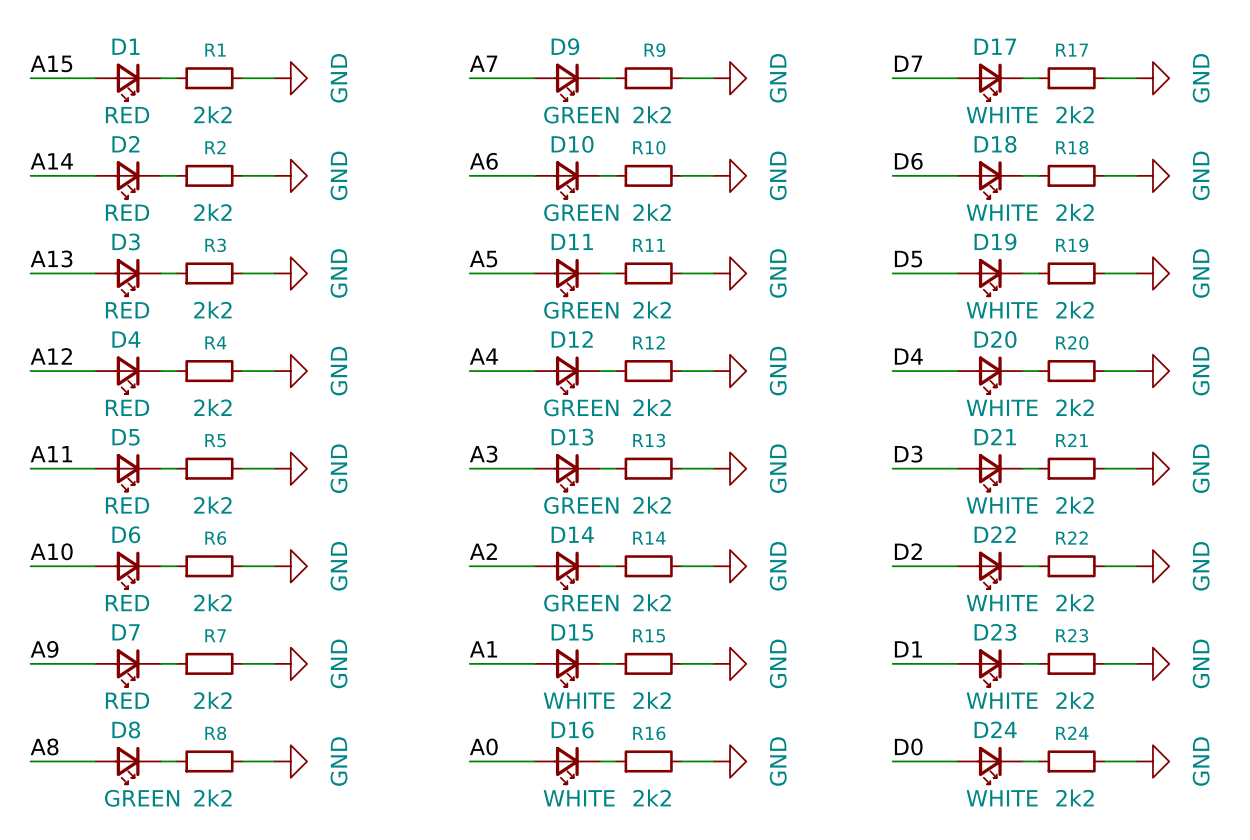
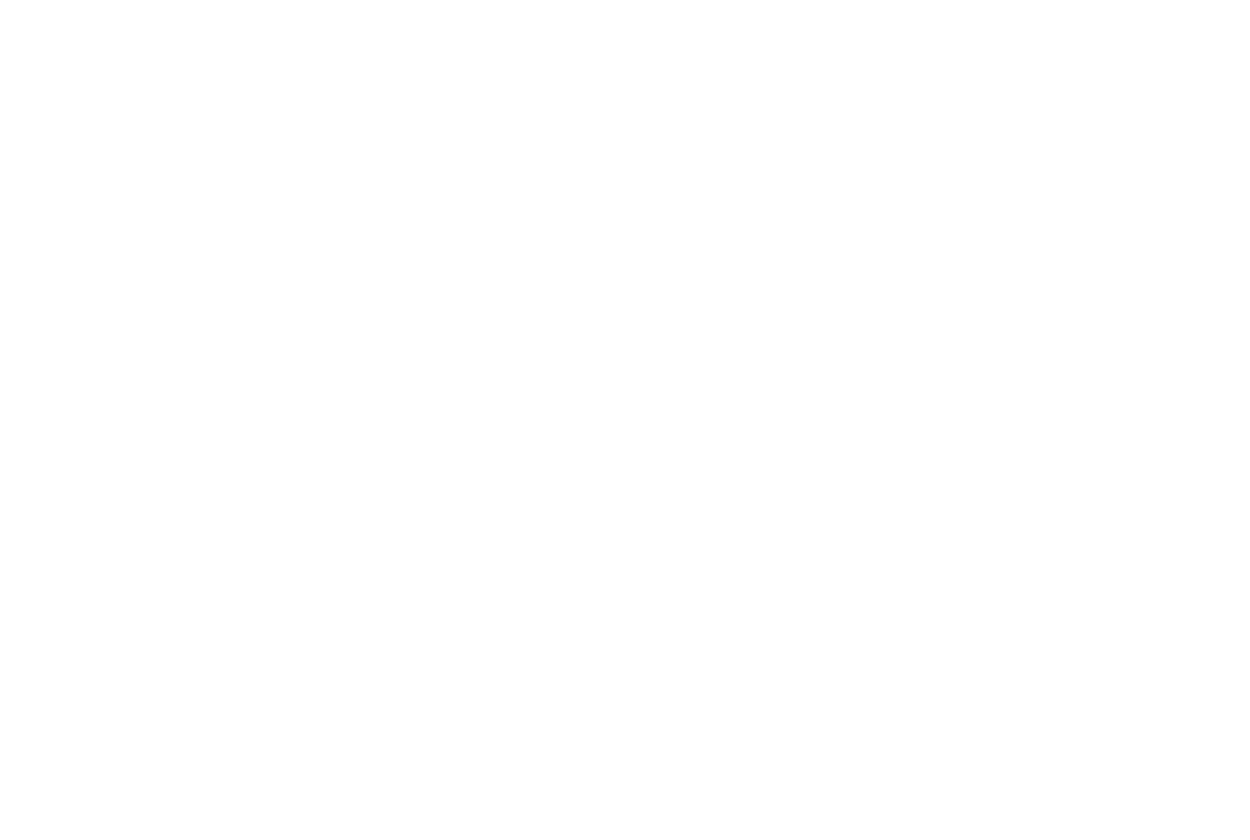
label: A15 (51, 63) -> none
label: A7 (483, 63) -> none
label: D7 (908, 63) -> none
wire: (30, 78) (95, 78) -> none
wire: (160, 78) (176, 78) -> none
R1: 2k2 (209, 78) -> none
wire: (241, 78) (274, 78) -> none
power symbol: GND (290, 78) -> none
wire: (469, 78) (534, 78) -> none
wire: (599, 78) (616, 78) -> none
R9: 2k2 (648, 78) -> none
wire: (681, 78) (713, 78) -> none
power symbol: GND (730, 78) -> none
wire: (892, 78) (957, 78) -> none
wire: (1022, 78) (1039, 78) -> none
R17: 2k2 (1071, 78) -> none
wire: (1104, 78) (1136, 78) -> none
power symbol: GND (1152, 78) -> none
D1: RED (128, 82) -> none
D9: GREEN (567, 82) -> none
D17: WHITE (990, 82) -> none
label: A14 (51, 161) -> none
label: A6 (483, 161) -> none
label: D6 (908, 161) -> none
wire: (30, 175) (95, 175) -> none
wire: (160, 175) (176, 175) -> none
R2: 2k2 (209, 175) -> none
wire: (241, 175) (274, 175) -> none
power symbol: GND (290, 175) -> none
wire: (469, 175) (534, 175) -> none
wire: (599, 175) (616, 175) -> none
R10: 2k2 (648, 175) -> none
wire: (681, 175) (713, 175) -> none
power symbol: GND (730, 175) -> none
wire: (892, 175) (957, 175) -> none
wire: (1022, 175) (1039, 175) -> none
R18: 2k2 (1071, 175) -> none
wire: (1104, 175) (1136, 175) -> none
power symbol: GND (1152, 175) -> none
D2: RED (128, 179) -> none
D10: GREEN (567, 179) -> none
D18: WHITE (990, 179) -> none
label: A13 (51, 258) -> none
label: A5 (483, 259) -> none
label: D5 (908, 259) -> none
wire: (30, 273) (95, 273) -> none
wire: (160, 273) (176, 273) -> none
R3: 2k2 (209, 273) -> none
wire: (241, 273) (274, 273) -> none
power symbol: GND (290, 273) -> none
wire: (469, 273) (534, 273) -> none
wire: (599, 273) (616, 273) -> none
R11: 2k2 (648, 273) -> none
wire: (681, 273) (713, 273) -> none
power symbol: GND (730, 273) -> none
wire: (892, 273) (957, 273) -> none
wire: (1022, 273) (1039, 273) -> none
R19: 2k2 (1071, 273) -> none
wire: (1104, 273) (1136, 273) -> none
power symbol: GND (1152, 273) -> none
D3: RED (128, 277) -> none
D11: GREEN (567, 277) -> none
D19: WHITE (990, 277) -> none
label: A12 (51, 356) -> none
label: A4 (483, 356) -> none
label: D4 (908, 356) -> none
wire: (30, 371) (95, 371) -> none
wire: (160, 371) (176, 371) -> none
R4: 2k2 (209, 371) -> none
wire: (241, 371) (274, 371) -> none
power symbol: GND (290, 371) -> none
wire: (469, 371) (534, 371) -> none
wire: (599, 371) (616, 371) -> none
R12: 2k2 (648, 371) -> none
wire: (681, 371) (713, 371) -> none
power symbol: GND (730, 371) -> none
wire: (892, 371) (957, 371) -> none
wire: (1022, 371) (1039, 371) -> none
R20: 2k2 (1071, 371) -> none
wire: (1104, 371) (1136, 371) -> none
power symbol: GND (1152, 371) -> none
D4: RED (128, 375) -> none
D12: GREEN (567, 375) -> none
D20: WHITE (990, 375) -> none
label: A11 (51, 454) -> none
label: A3 (483, 454) -> none
label: D3 (908, 454) -> none
wire: (30, 468) (95, 468) -> none
wire: (160, 468) (176, 468) -> none
R5: 2k2 (209, 468) -> none
wire: (241, 468) (274, 468) -> none
power symbol: GND (290, 468) -> none
wire: (469, 468) (534, 468) -> none
wire: (599, 468) (616, 468) -> none
R13: 2k2 (648, 468) -> none
wire: (681, 468) (713, 468) -> none
power symbol: GND (730, 468) -> none
wire: (892, 468) (957, 468) -> none
wire: (1022, 468) (1039, 468) -> none
R21: 2k2 (1071, 468) -> none
wire: (1104, 468) (1136, 468) -> none
power symbol: GND (1152, 468) -> none
D5: RED (128, 472) -> none
D13: GREEN (567, 472) -> none
D21: WHITE (990, 472) -> none
label: A10 (51, 551) -> none
label: A2 (483, 551) -> none
label: D2 (908, 551) -> none
wire: (30, 566) (95, 566) -> none
wire: (160, 566) (176, 566) -> none
R6: 2k2 (209, 566) -> none
wire: (241, 566) (274, 566) -> none
power symbol: GND (290, 566) -> none
wire: (469, 566) (534, 566) -> none
wire: (599, 566) (616, 566) -> none
R14: 2k2 (648, 566) -> none
wire: (681, 566) (713, 566) -> none
power symbol: GND (730, 566) -> none
wire: (892, 566) (957, 566) -> none
wire: (1022, 566) (1039, 566) -> none
R22: 2k2 (1071, 566) -> none
wire: (1104, 566) (1136, 566) -> none
power symbol: GND (1152, 566) -> none
D6: RED (128, 570) -> none
D14: GREEN (567, 570) -> none
D22: WHITE (990, 570) -> none
label: A9 (44, 649) -> none
label: A1 (483, 649) -> none
label: D1 (908, 649) -> none
wire: (30, 663) (95, 663) -> none
wire: (160, 663) (176, 663) -> none
R7: 2k2 (209, 663) -> none
wire: (241, 663) (274, 663) -> none
power symbol: GND (290, 663) -> none
wire: (469, 663) (534, 663) -> none
wire: (599, 663) (616, 663) -> none
R15: 2k2 (648, 663) -> none
wire: (681, 663) (713, 663) -> none
power symbol: GND (730, 663) -> none
wire: (892, 663) (957, 663) -> none
wire: (1022, 663) (1039, 663) -> none
R23: 2k2 (1071, 663) -> none
wire: (1104, 663) (1136, 663) -> none
power symbol: GND (1152, 663) -> none
D7: RED (128, 667) -> none
D15: WHITE (567, 667) -> none
D23: WHITE (990, 667) -> none
label: A8 (44, 746) -> none
label: A0 (483, 746) -> none
label: D0 (908, 746) -> none
wire: (30, 761) (95, 761) -> none
wire: (160, 761) (176, 761) -> none
R8: 2k2 (209, 761) -> none
wire: (241, 761) (274, 761) -> none
power symbol: GND (290, 761) -> none
wire: (469, 761) (534, 761) -> none
wire: (599, 761) (616, 761) -> none
R16: 2k2 (648, 761) -> none
wire: (681, 761) (713, 761) -> none
power symbol: GND (730, 761) -> none
wire: (892, 761) (957, 761) -> none
wire: (1022, 761) (1039, 761) -> none
R24: 2k2 (1071, 761) -> none
wire: (1104, 761) (1136, 761) -> none
power symbol: GND (1152, 761) -> none
D8: GREEN (128, 765) -> none
D16: WHITE (567, 765) -> none
D24: WHITE (990, 765) -> none

